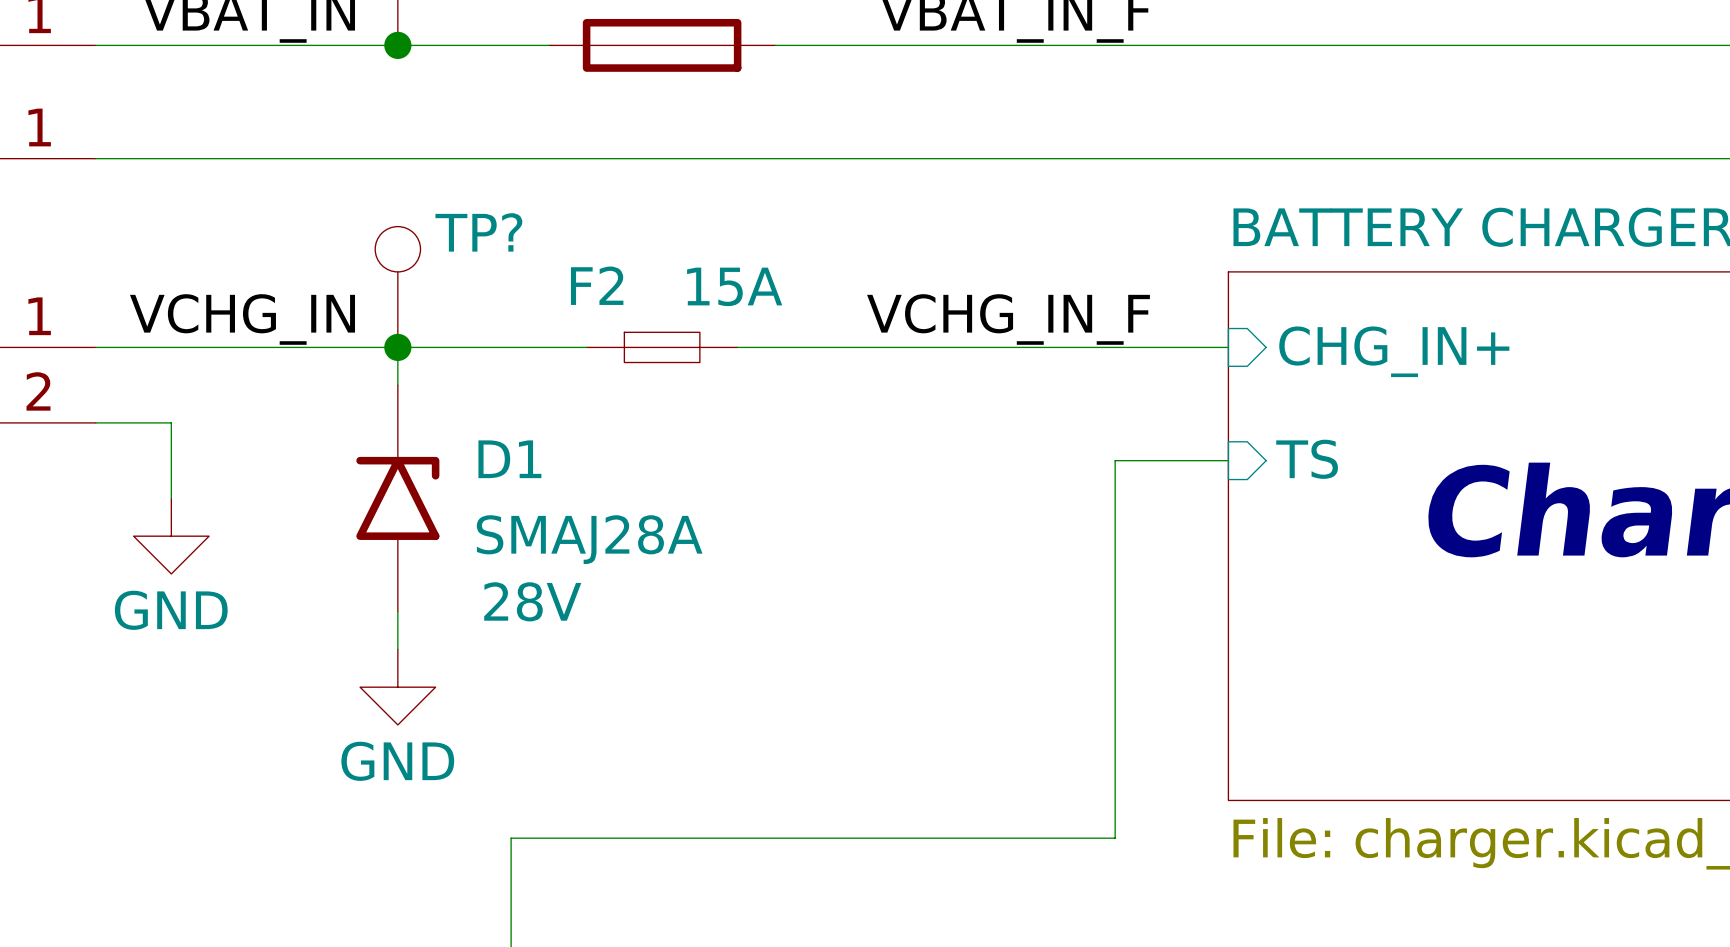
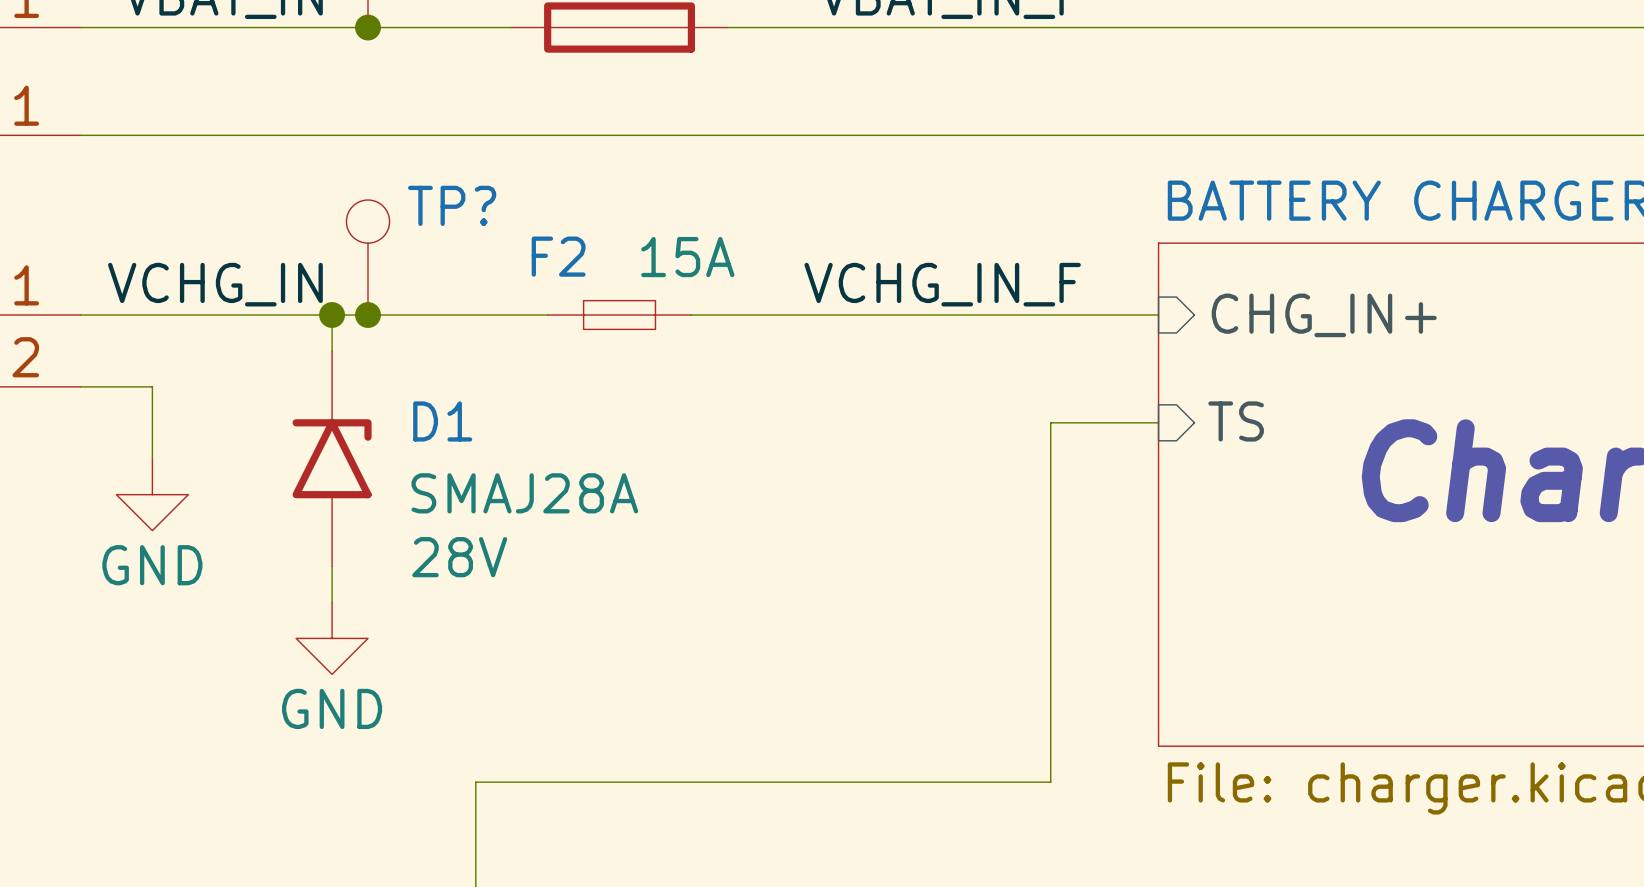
junction: none -> (332, 315)
wire: (397, 347) (397, 385) -> (332, 315) (332, 350)
D1 position: (397, 498) -> (332, 458)
wire: (397, 611) (397, 649) -> (332, 566) (332, 602)
power symbol position: GND (397, 687) -> GND (332, 638)

